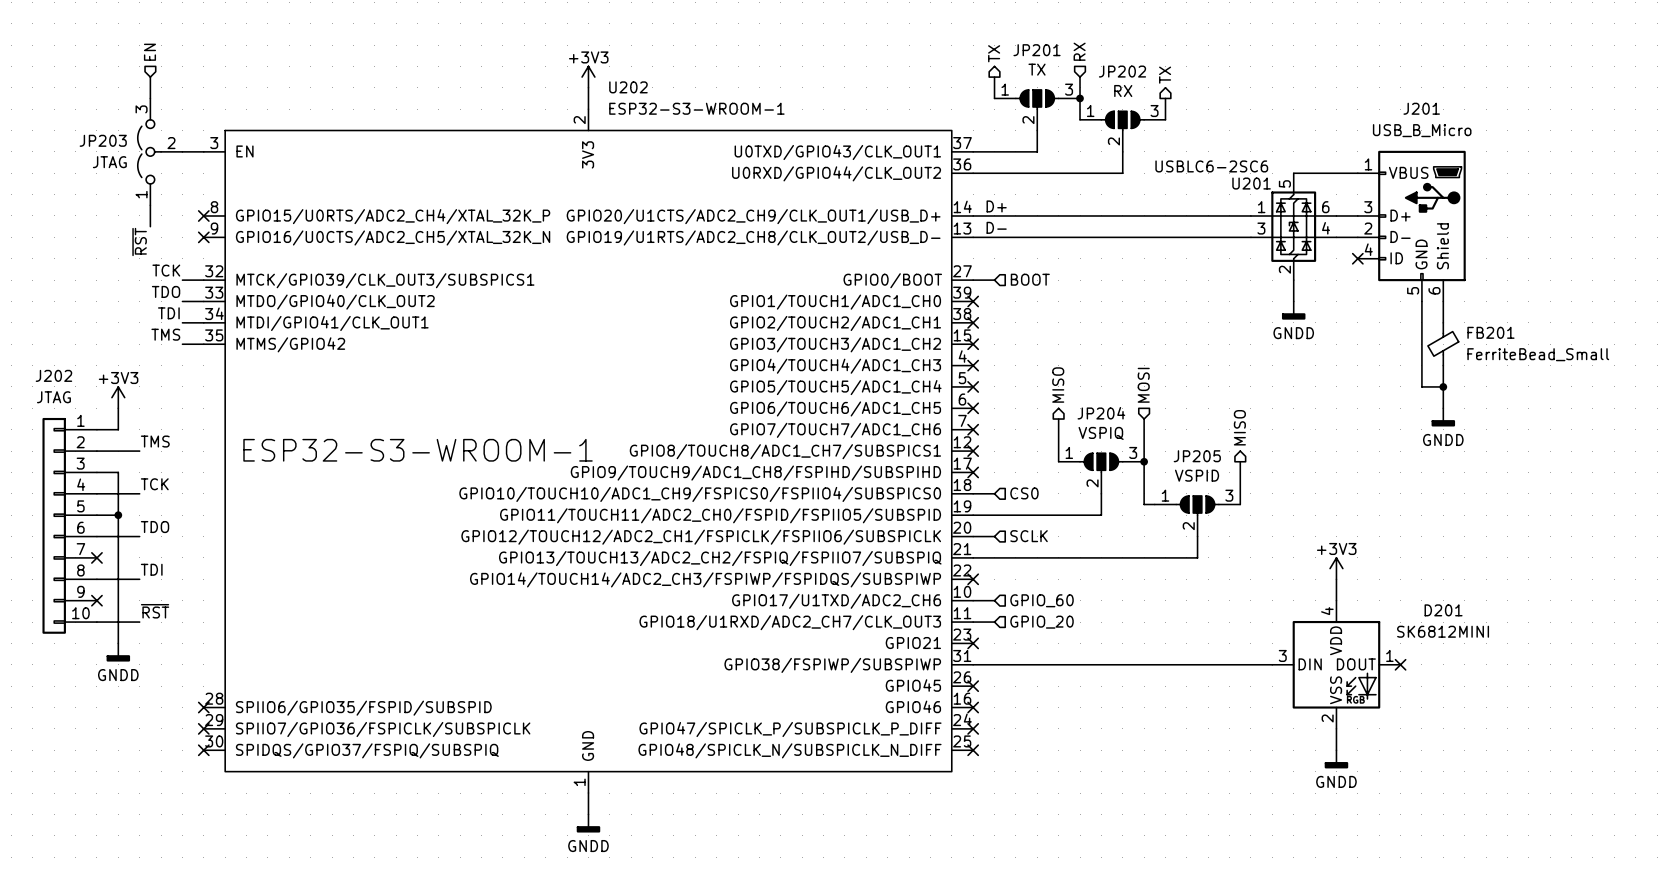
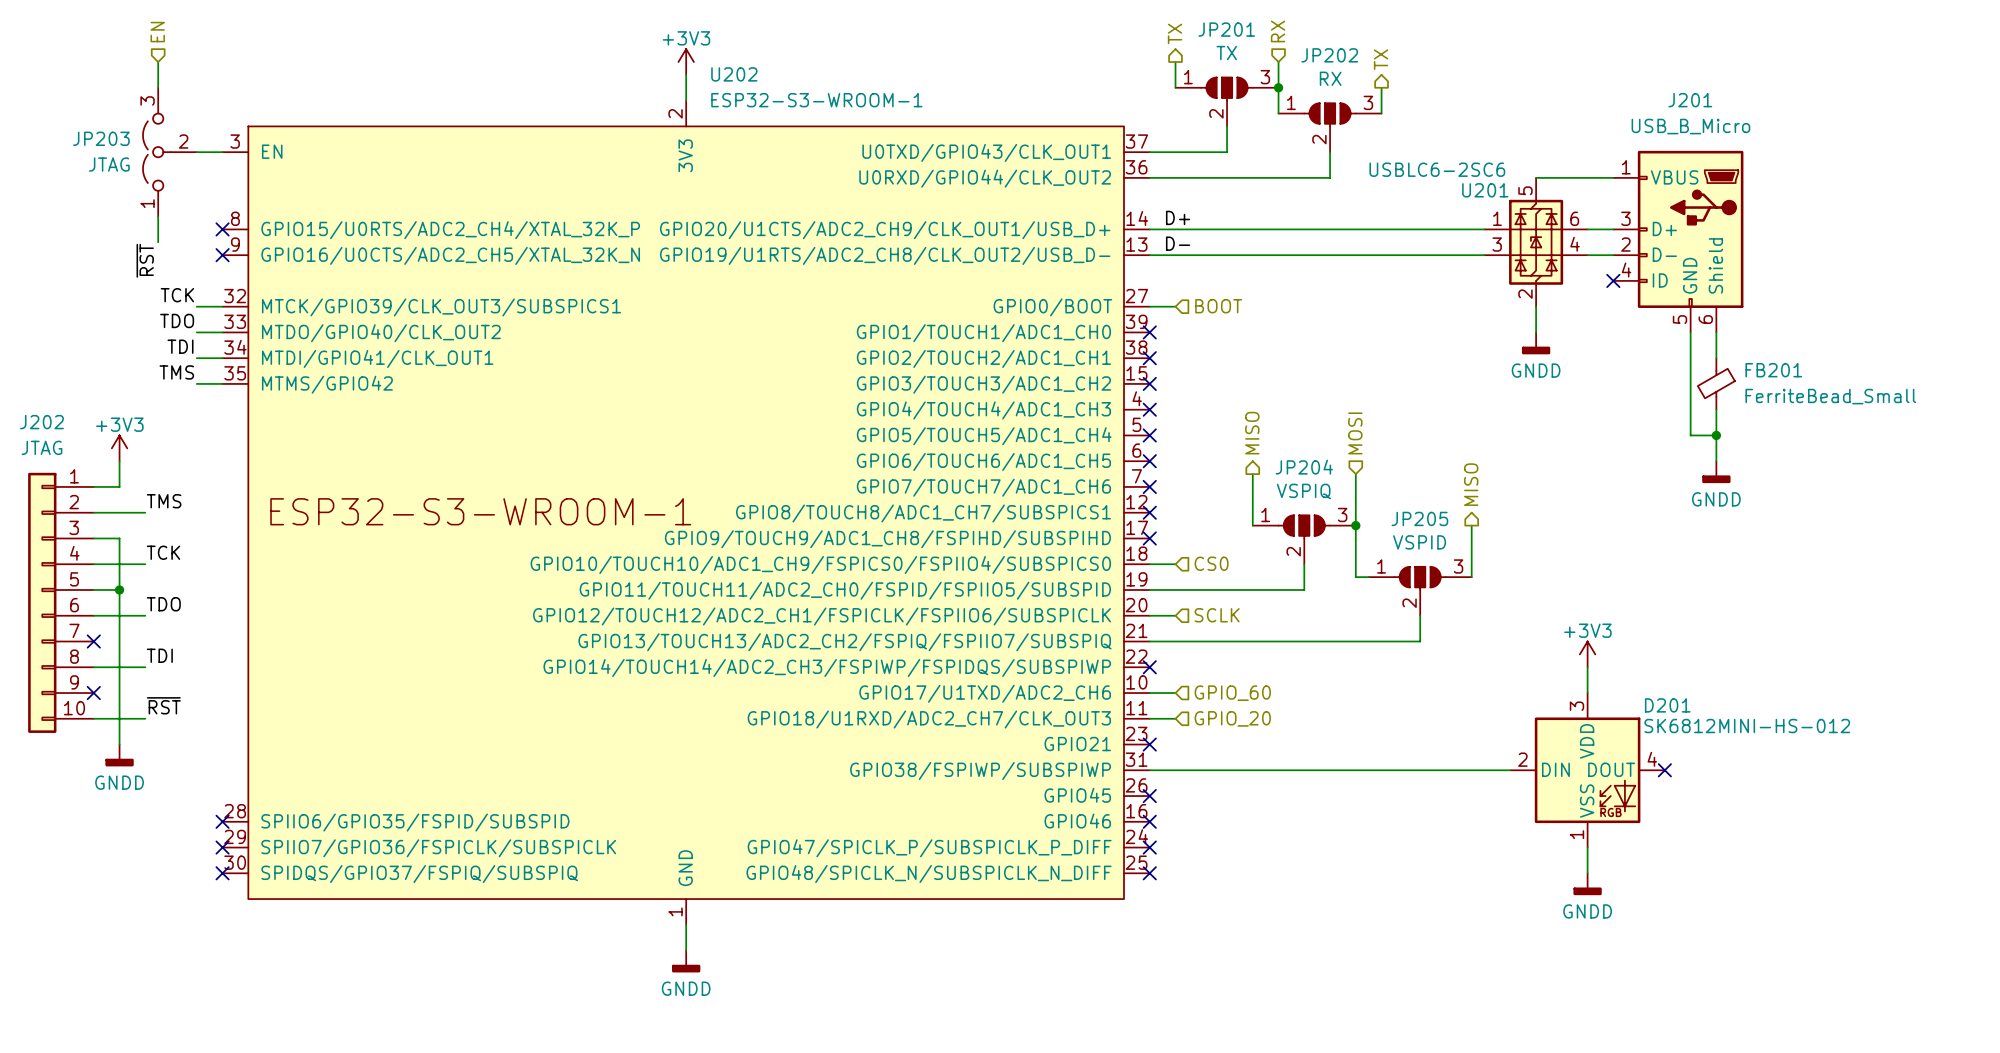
D201 name position: D201 (1443, 610) -> D201 (1667, 705)
D201 pin number: 4 (1327, 611) -> 3 (1576, 706)
D201 value: SK6812MINI (1443, 631) -> SK6812MINI-HS-012 (1747, 726)
D201 pin number: 3 (1282, 655) -> 2 (1522, 759)
D201 pin number: 1 (1389, 655) -> 4 (1652, 759)
D201 pin number: 2 (1327, 718) -> 1 (1576, 834)

